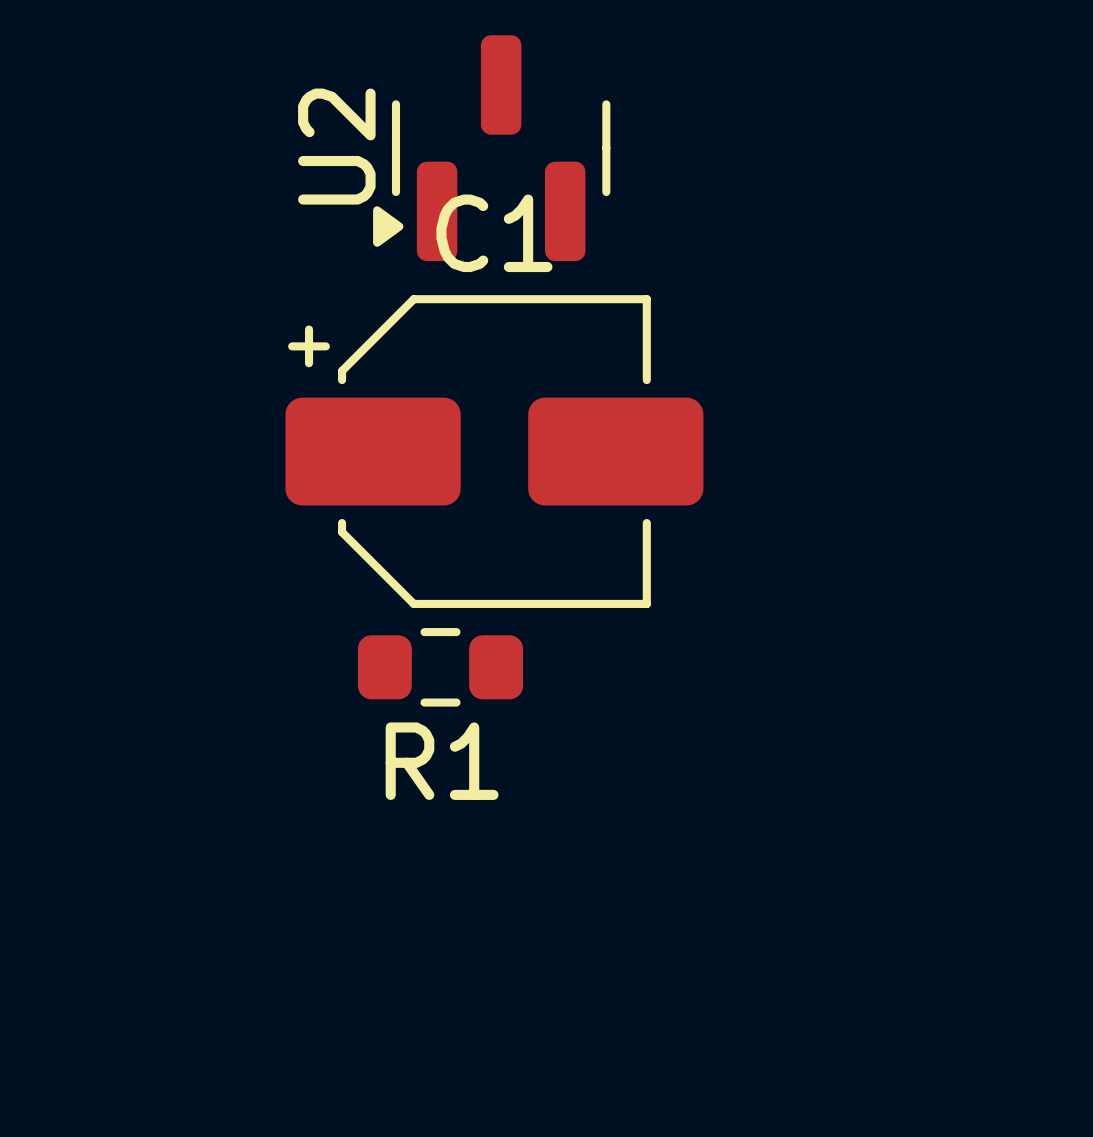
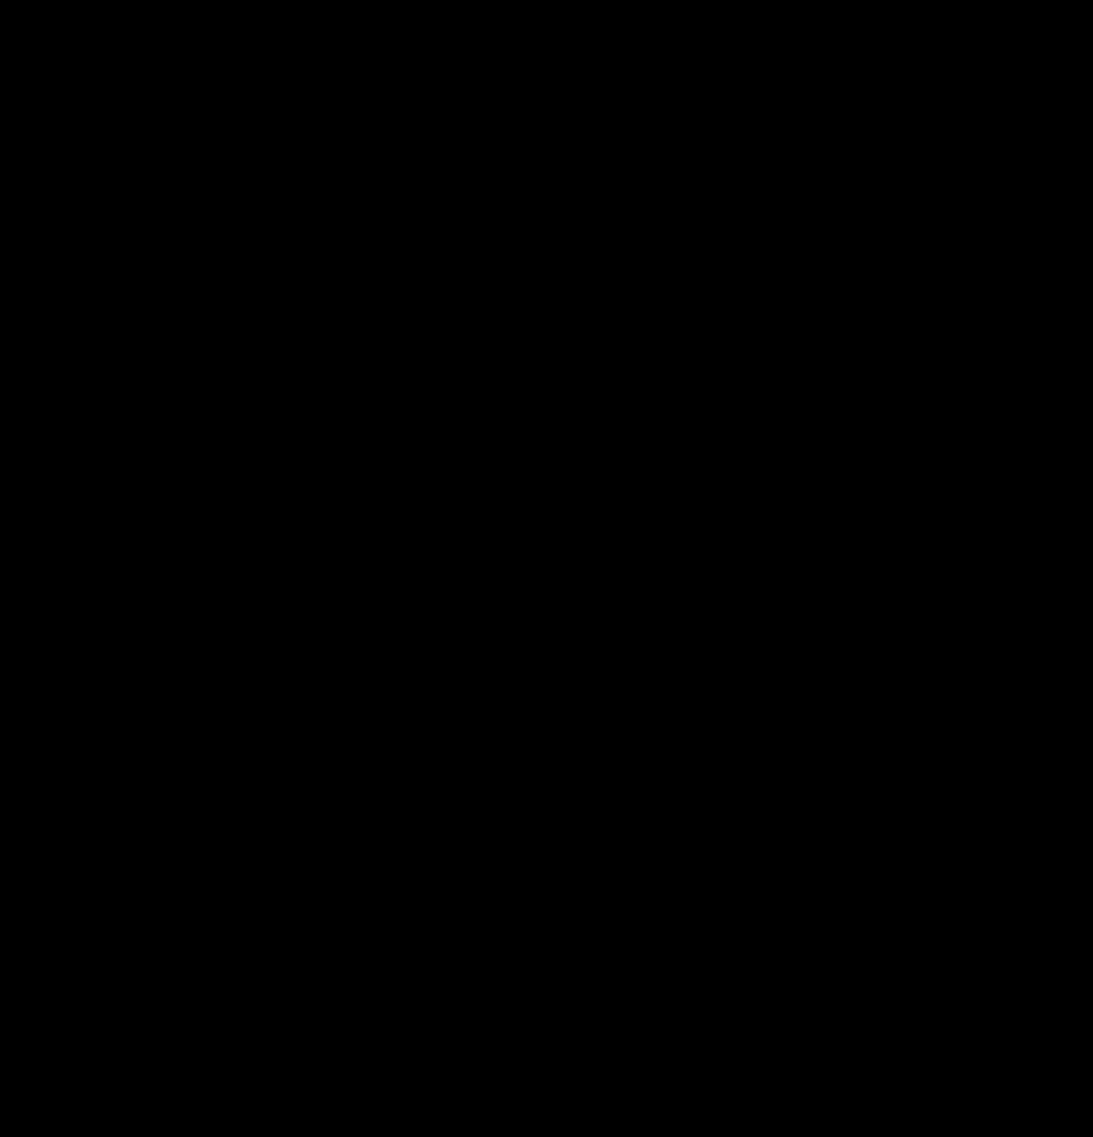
U2: (491, 148) -> none
C1: (494, 451) -> none
R1: (440, 667) -> none

